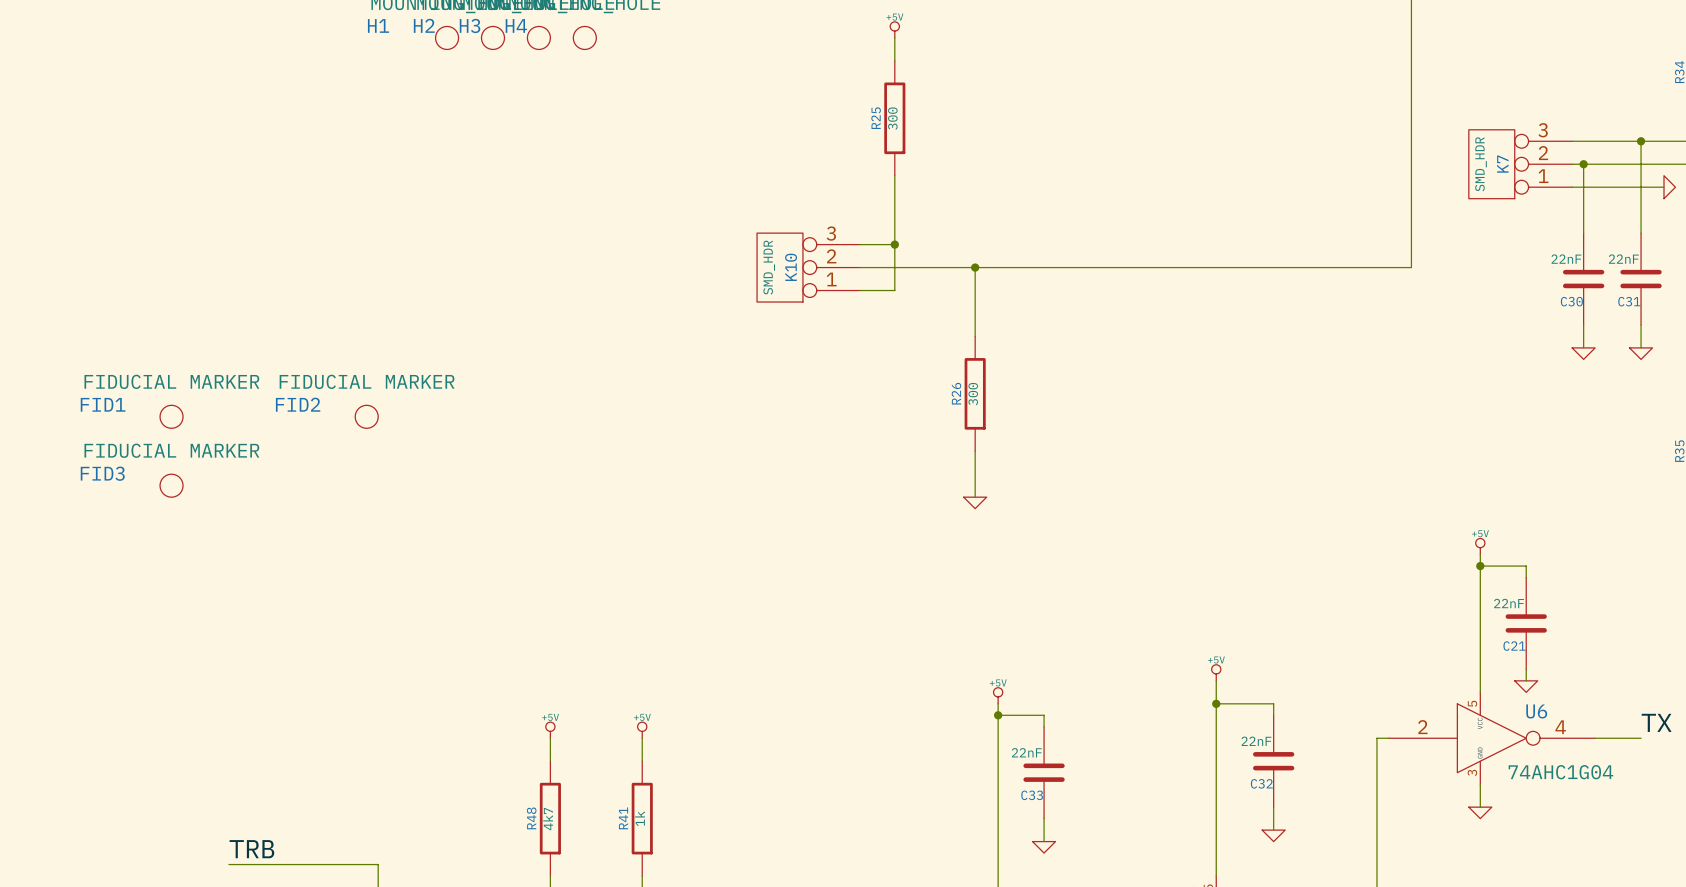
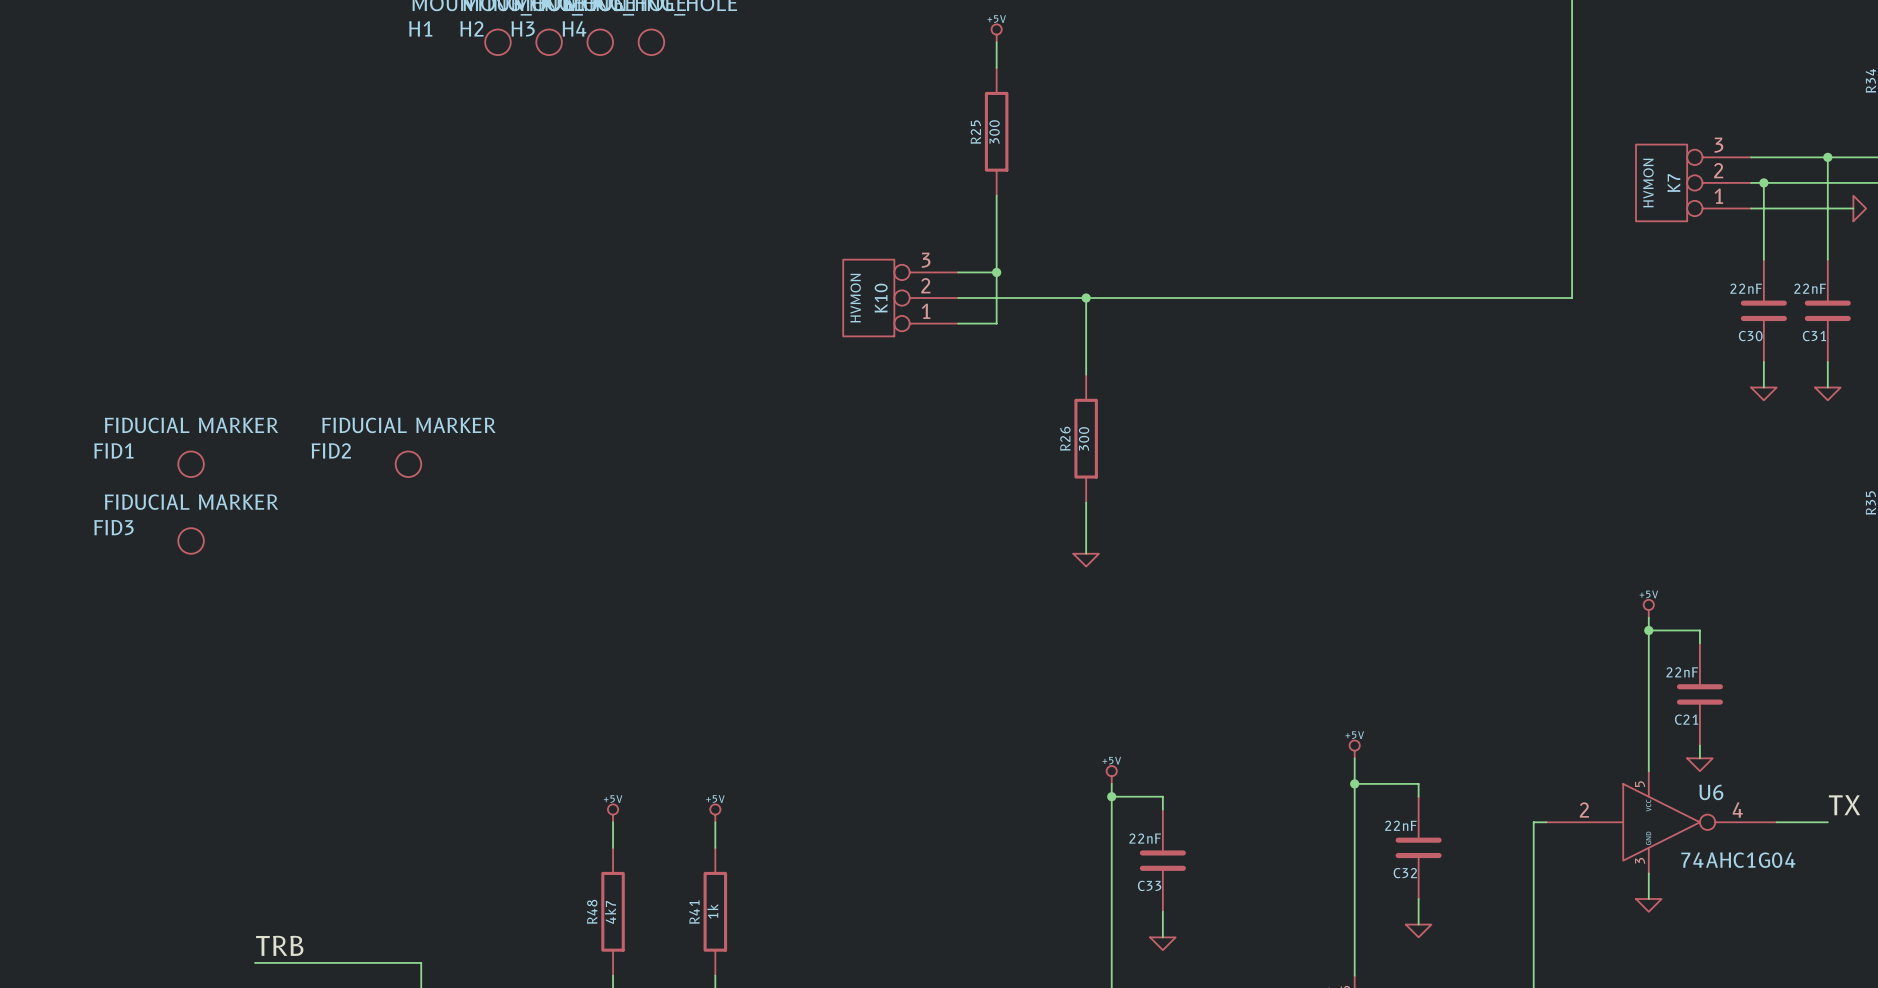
K7 value: SMD_HDR (1481, 164) -> HVMON (1648, 183)
K10 value: SMD_HDR (769, 267) -> HVMON (855, 298)

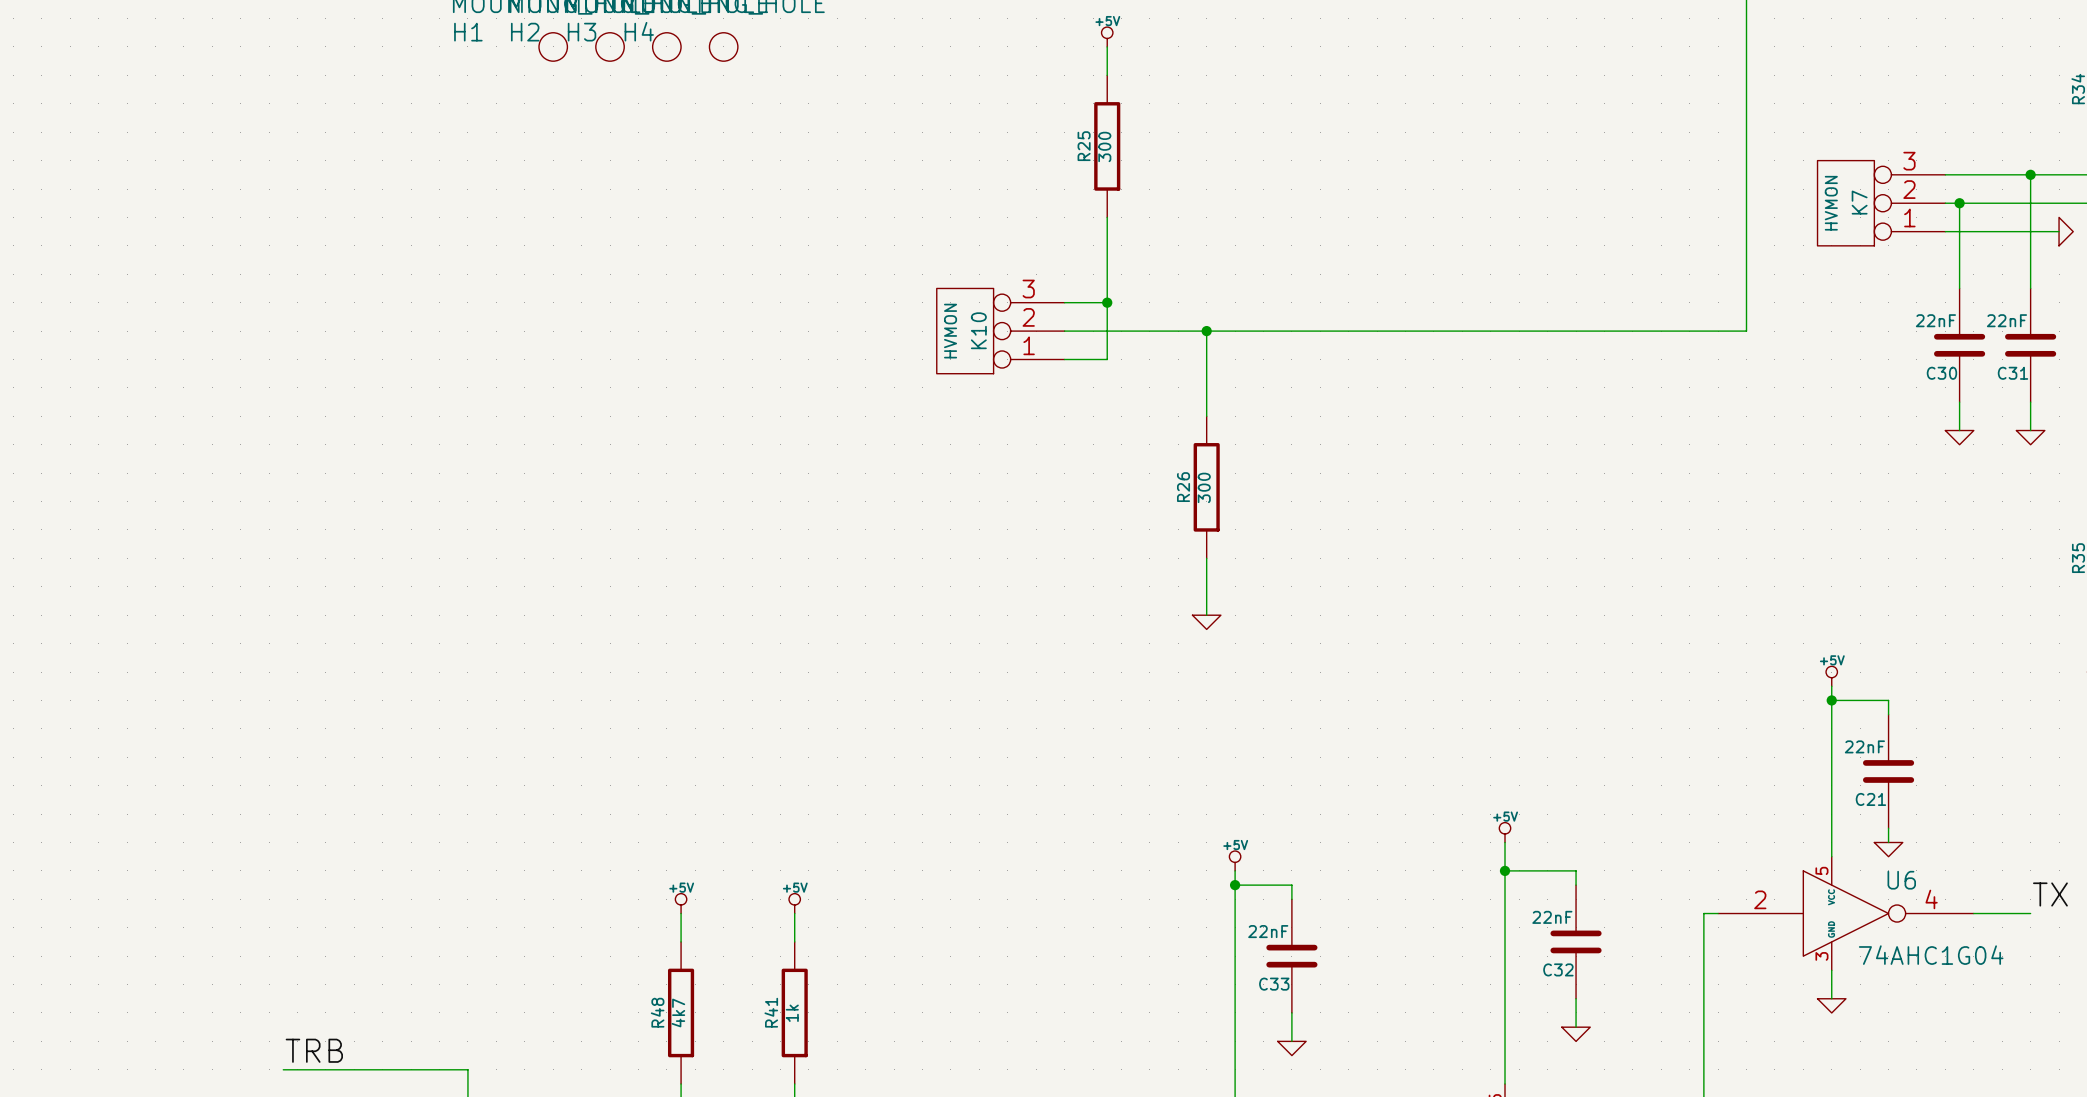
FID1: FIDUCIAL MARKER (191, 464) -> none
FID2: FIDUCIAL MARKER (408, 464) -> none
FID3: FIDUCIAL MARKER (191, 540) -> none

